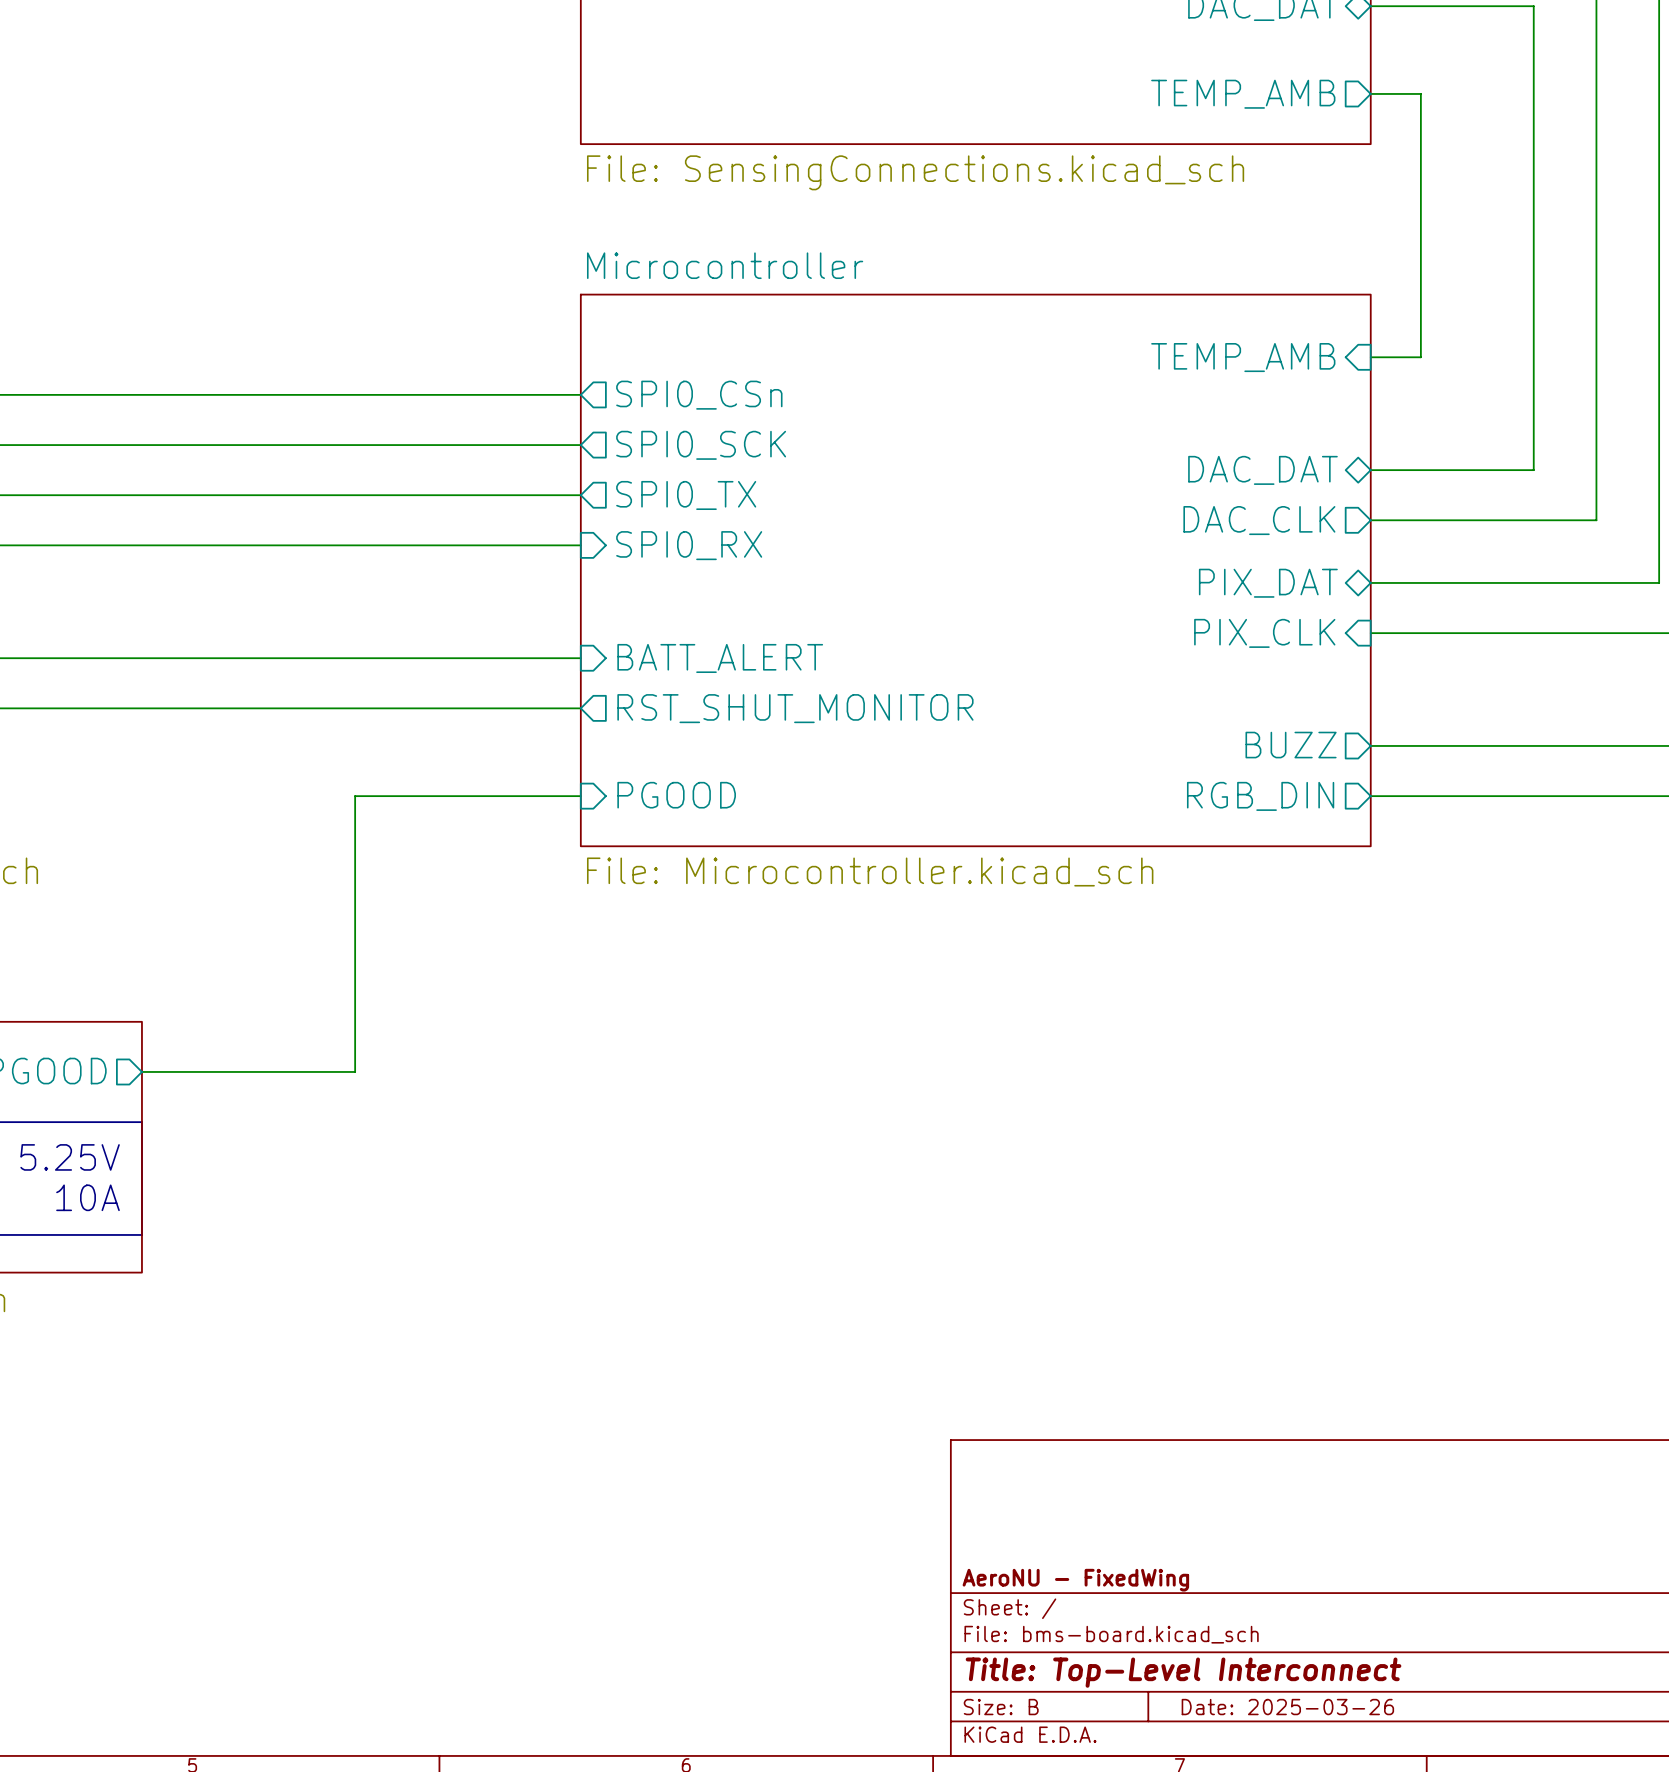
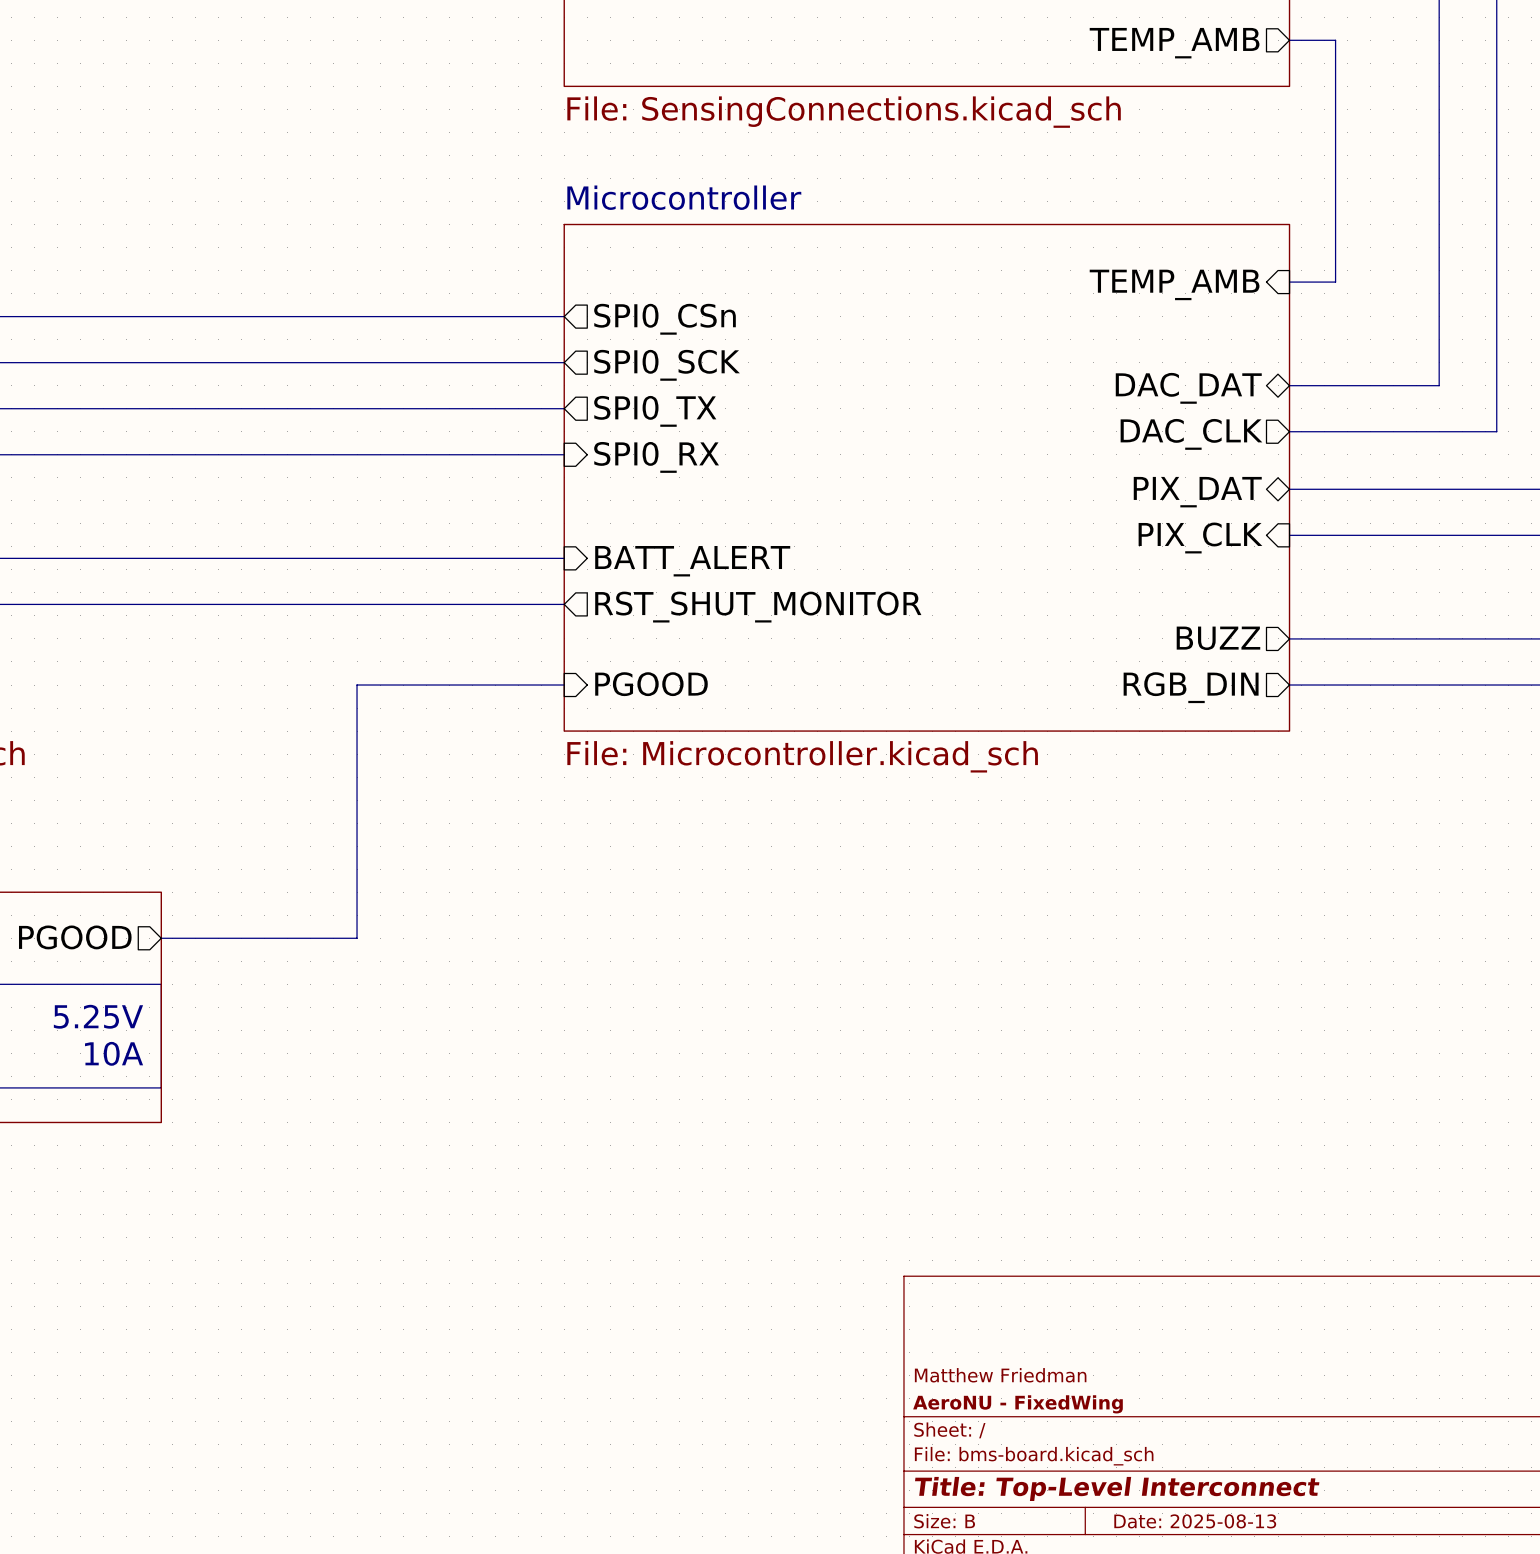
title block: none -> Matthew Friedman (1000, 1375)
title block: Date: 2025-03-26 (1287, 1707) -> Date: 2025-08-13 (1195, 1521)

